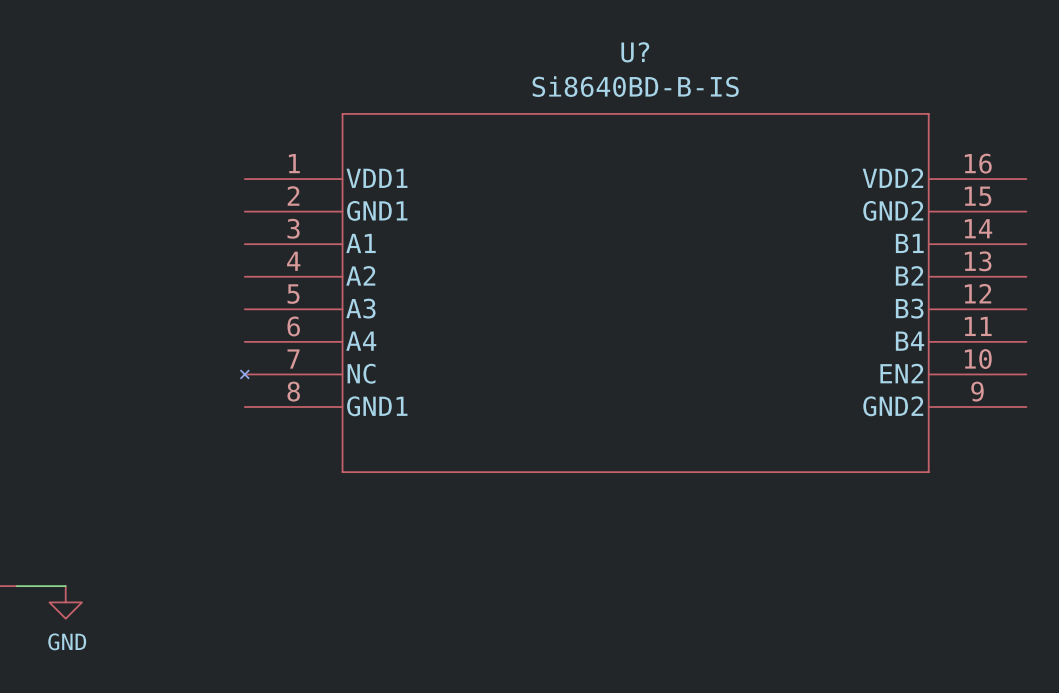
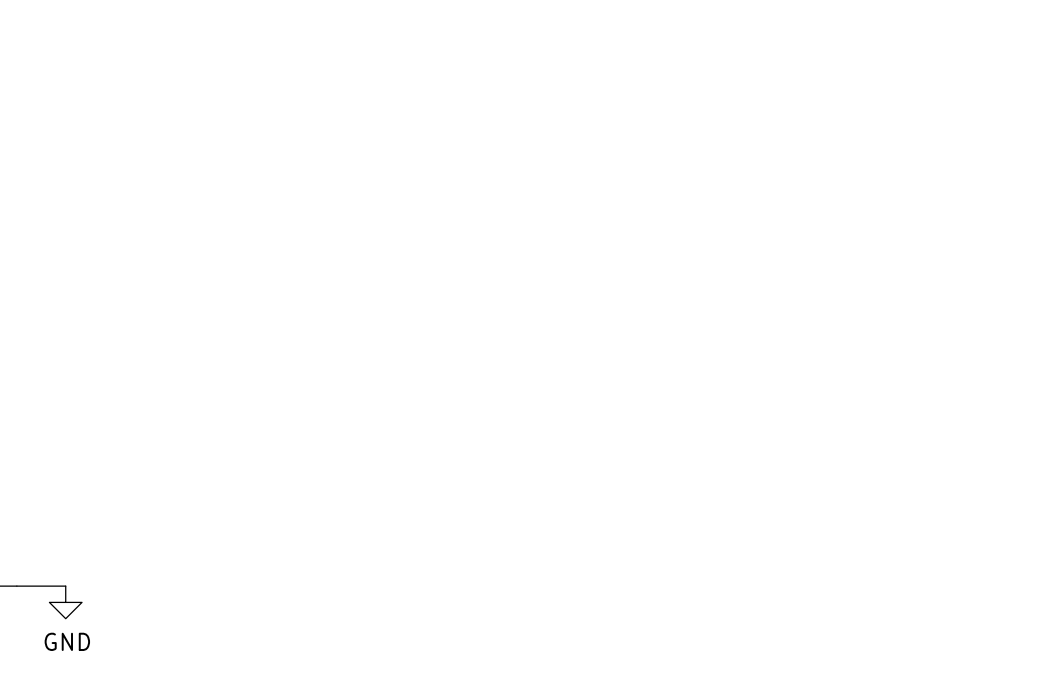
U?: Si8640BD-B-IS (633, 293) -> none

